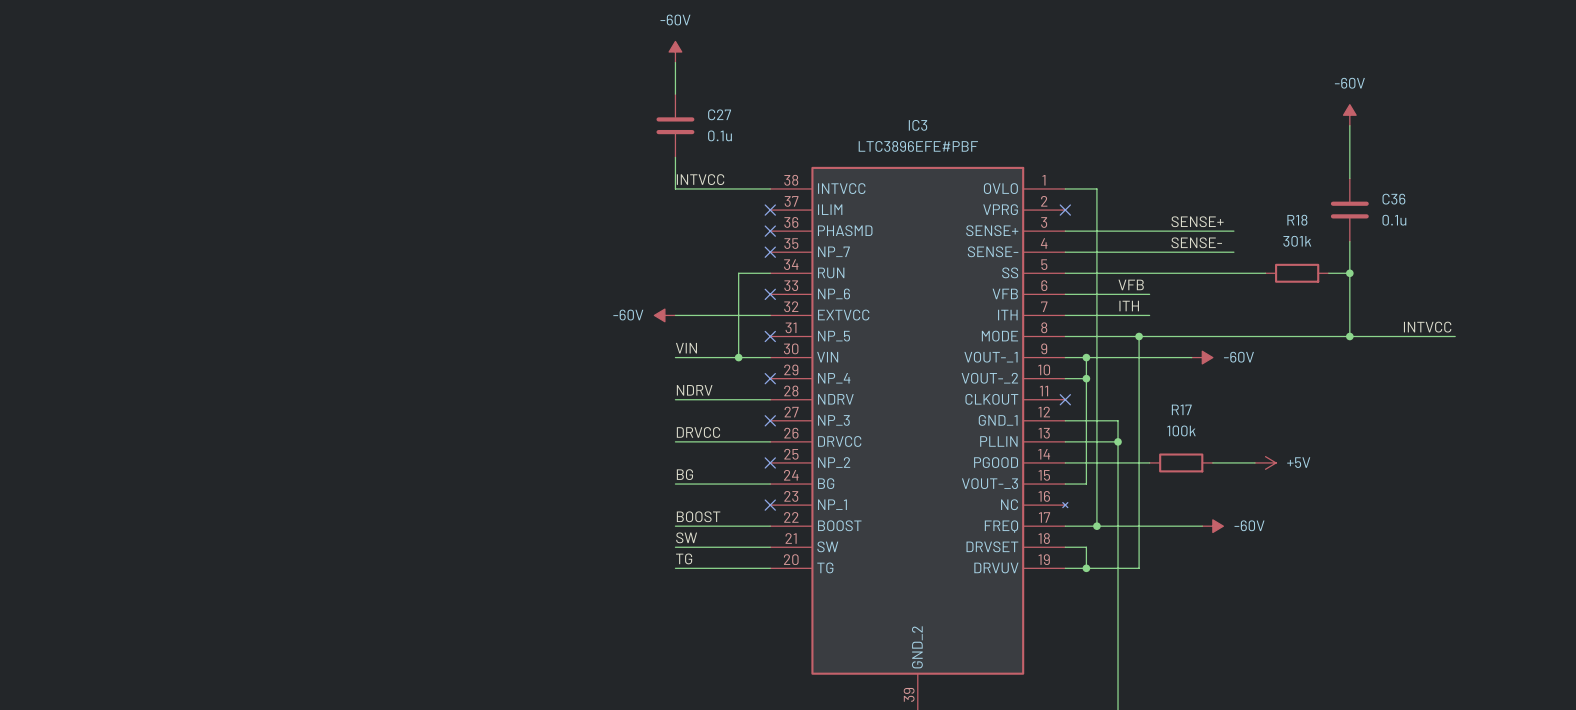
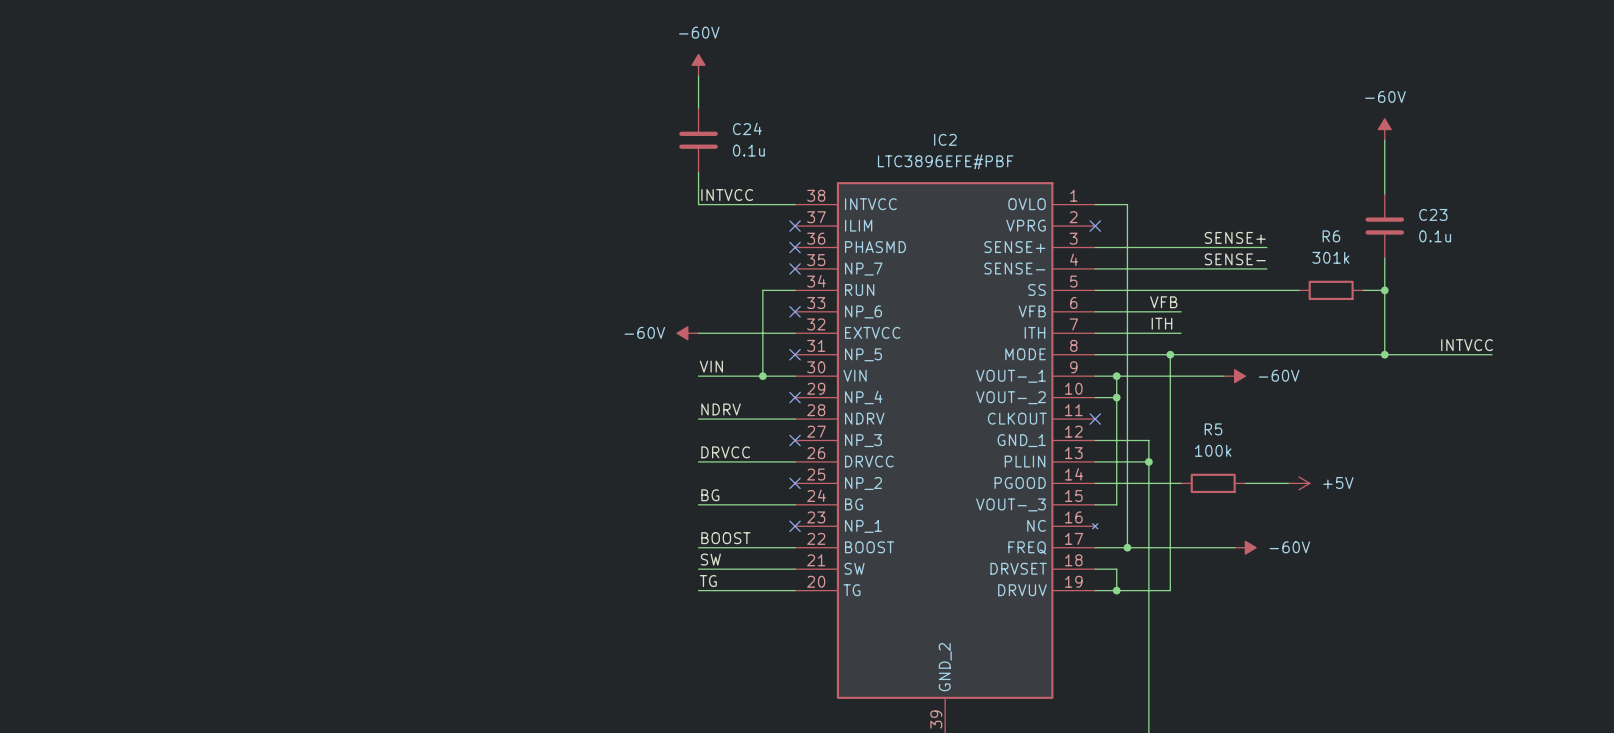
C27 name: C27 (719, 114) -> C24 (747, 128)
IC3 name: IC3 (918, 125) -> IC2 (945, 139)
C36 name: C36 (1393, 199) -> C23 (1433, 214)
R18 name: R18 (1297, 220) -> R6 (1331, 236)
R17 name: R17 (1181, 409) -> R5 (1213, 429)

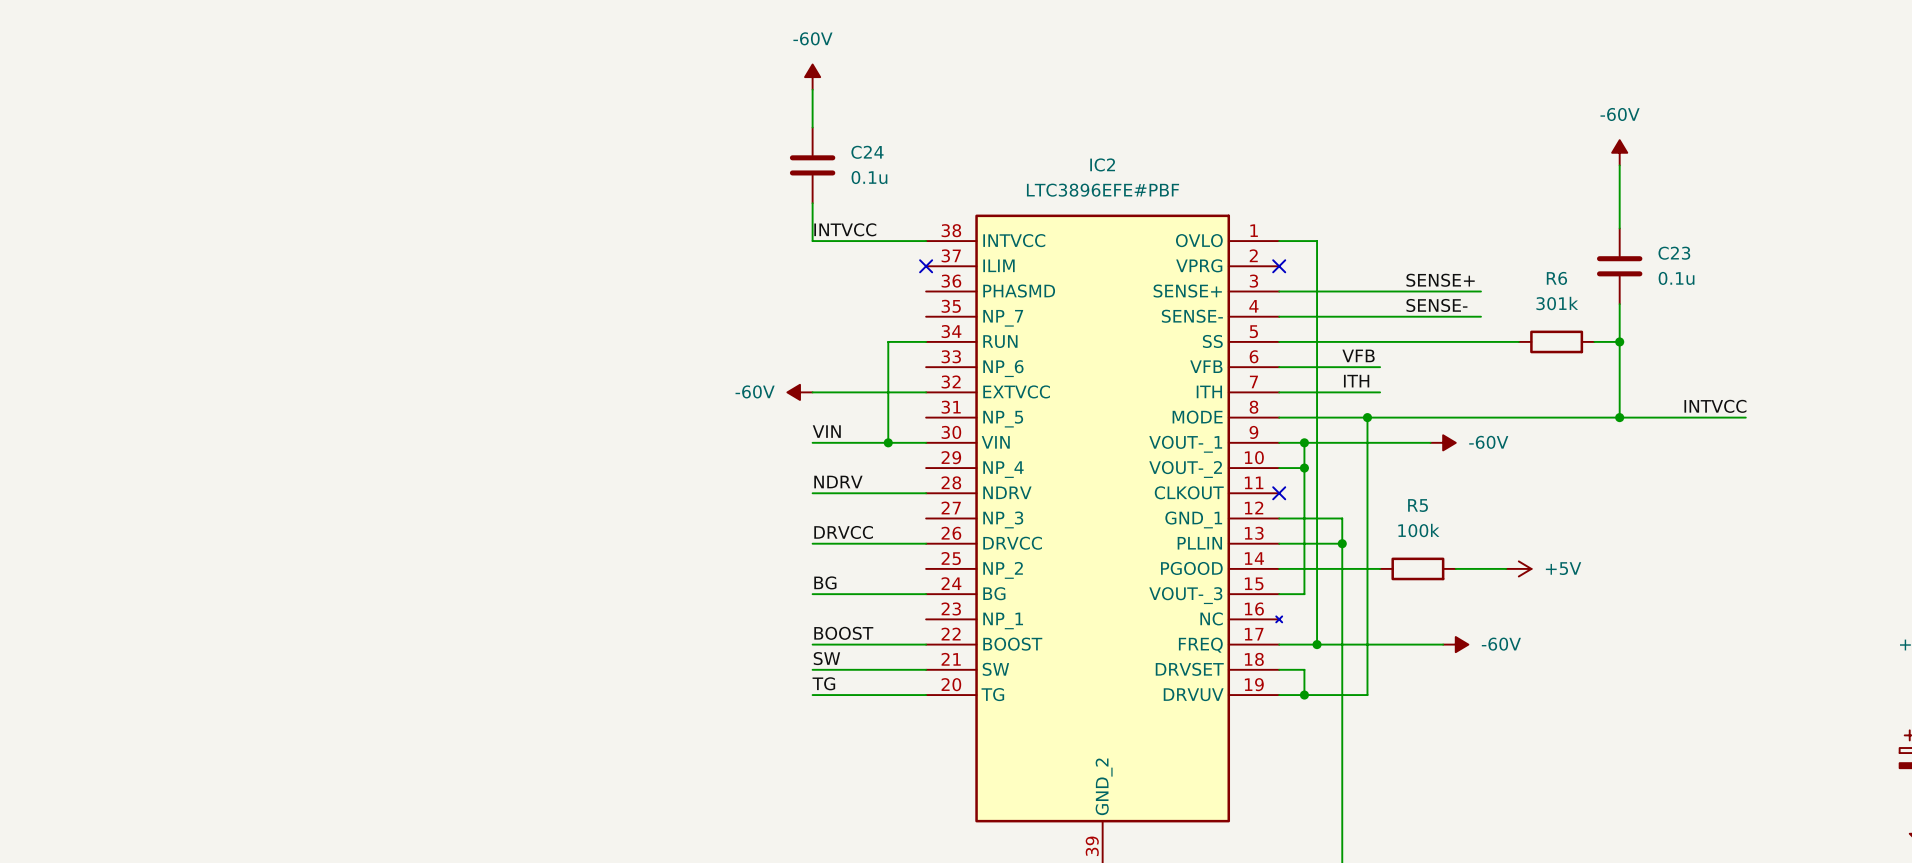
no-connect mark: (795, 247) -> none
no-connect mark: (795, 268) -> none
no-connect mark: (795, 311) -> none
no-connect mark: (795, 354) -> none
no-connect mark: (795, 397) -> none
no-connect mark: (795, 440) -> none
no-connect mark: (795, 483) -> none
no-connect mark: (795, 526) -> none

